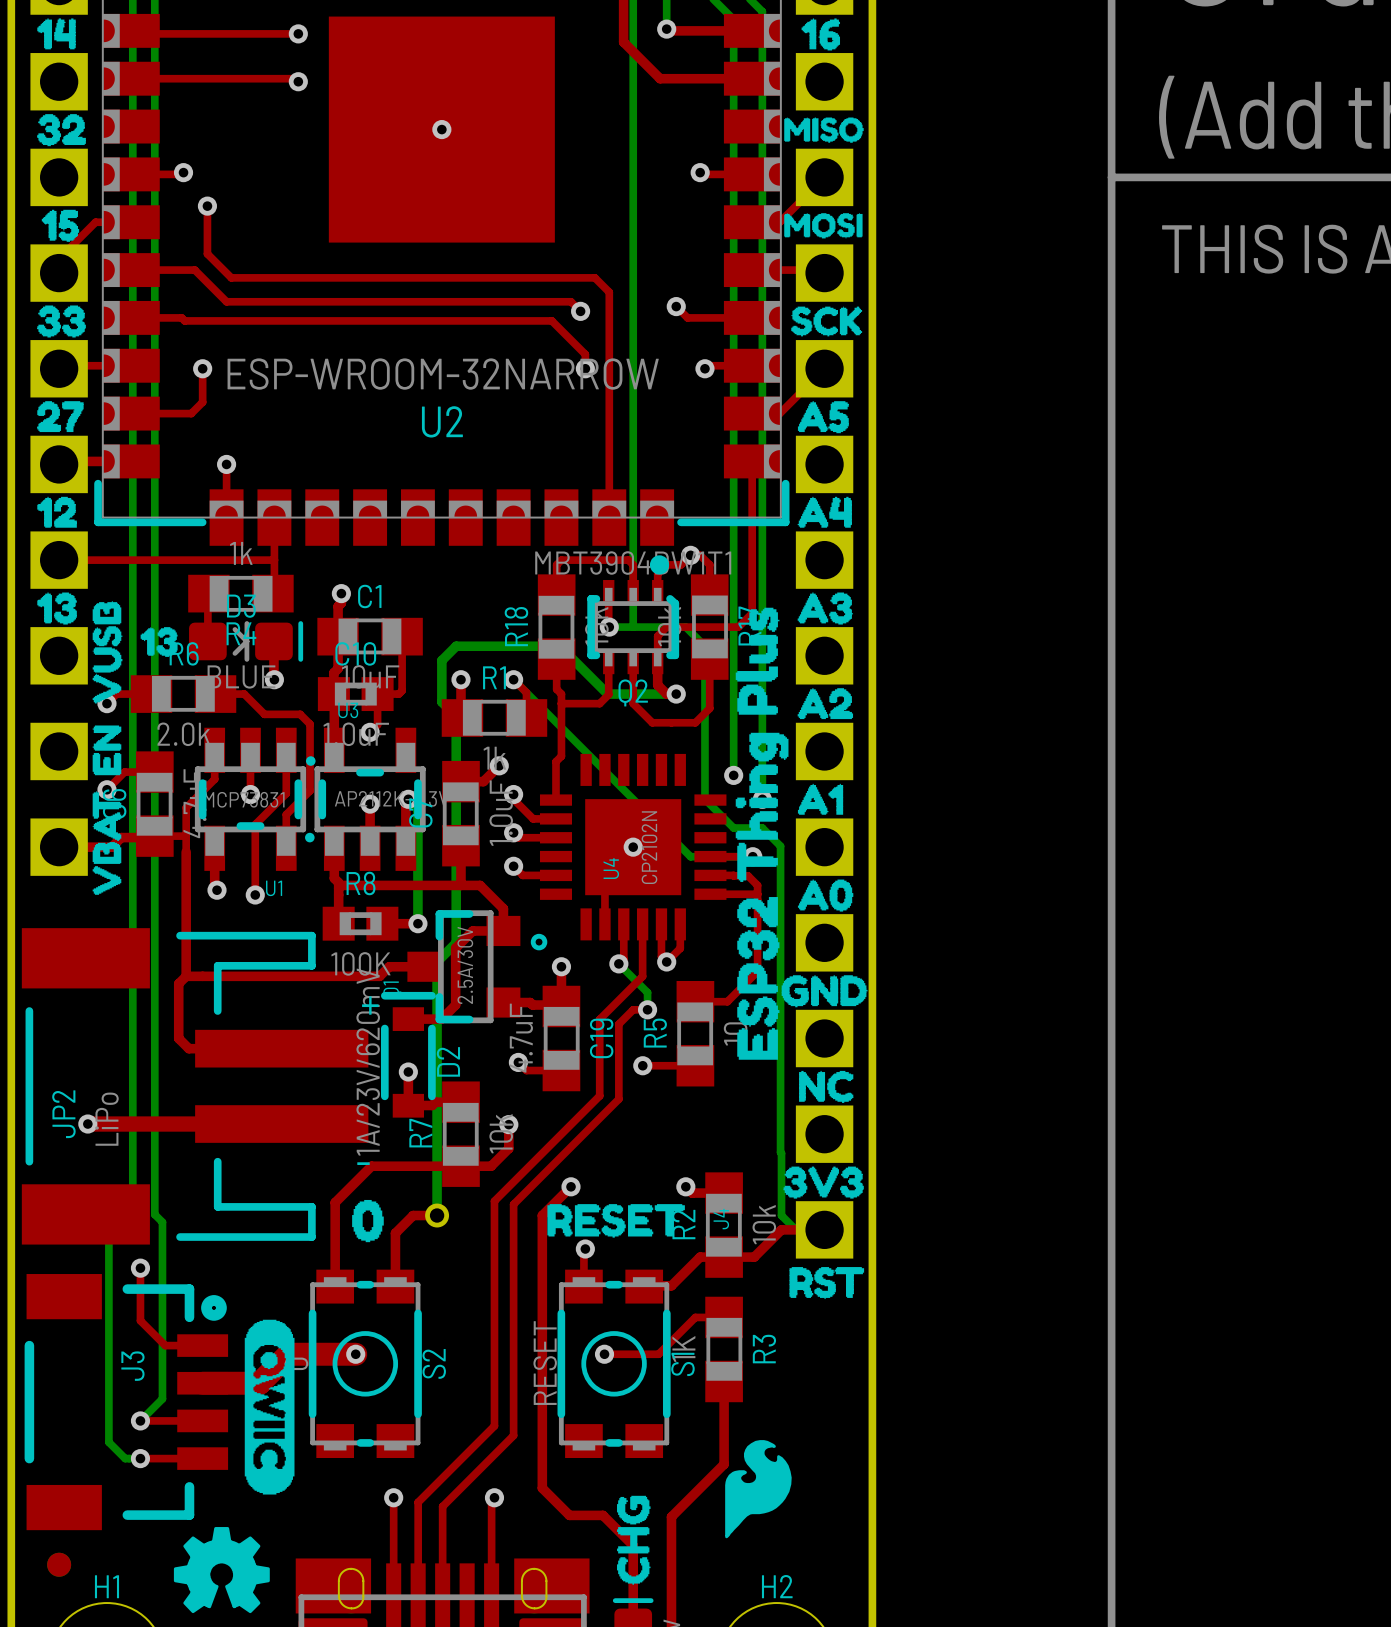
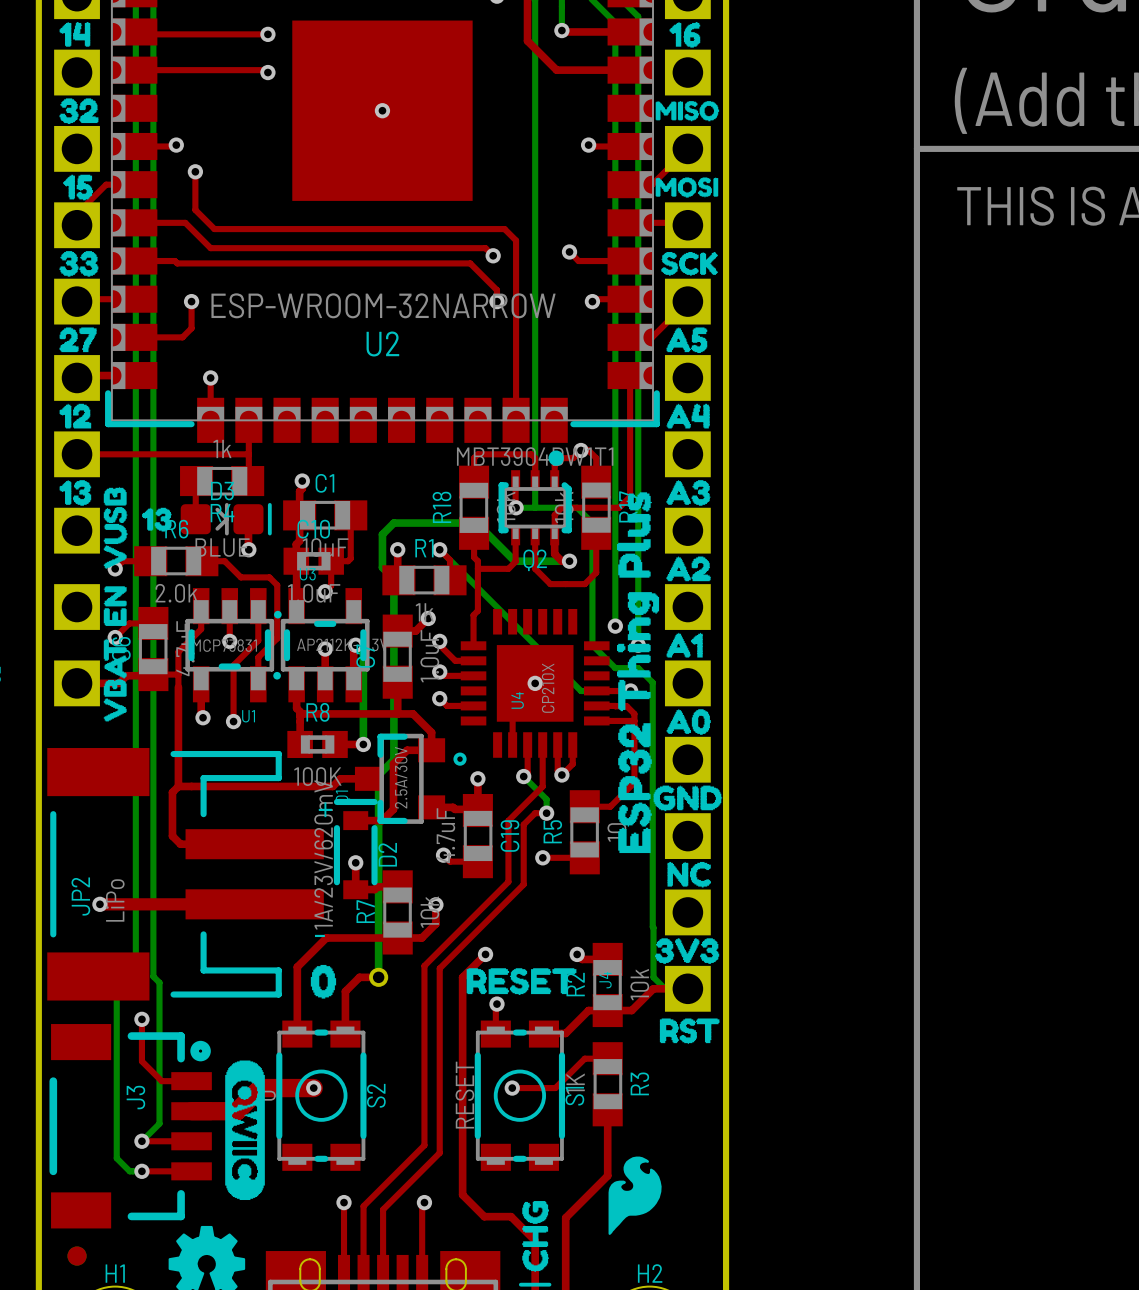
U4 value: CP2102N (649, 847) -> CP210X (548, 688)

